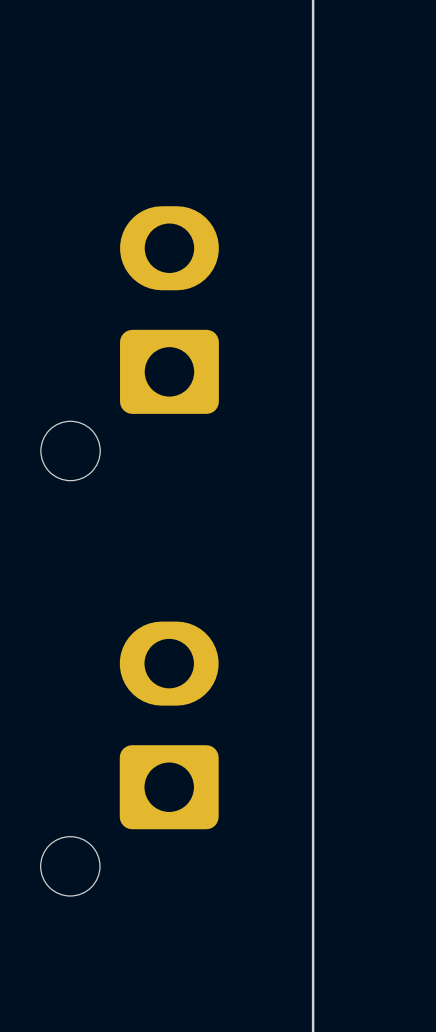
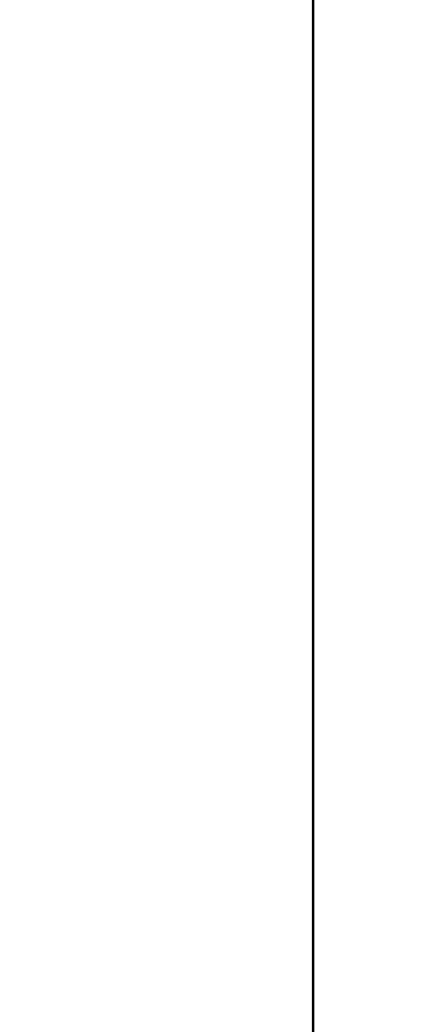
part: (129, 343) -> none
part: (129, 758) -> none

